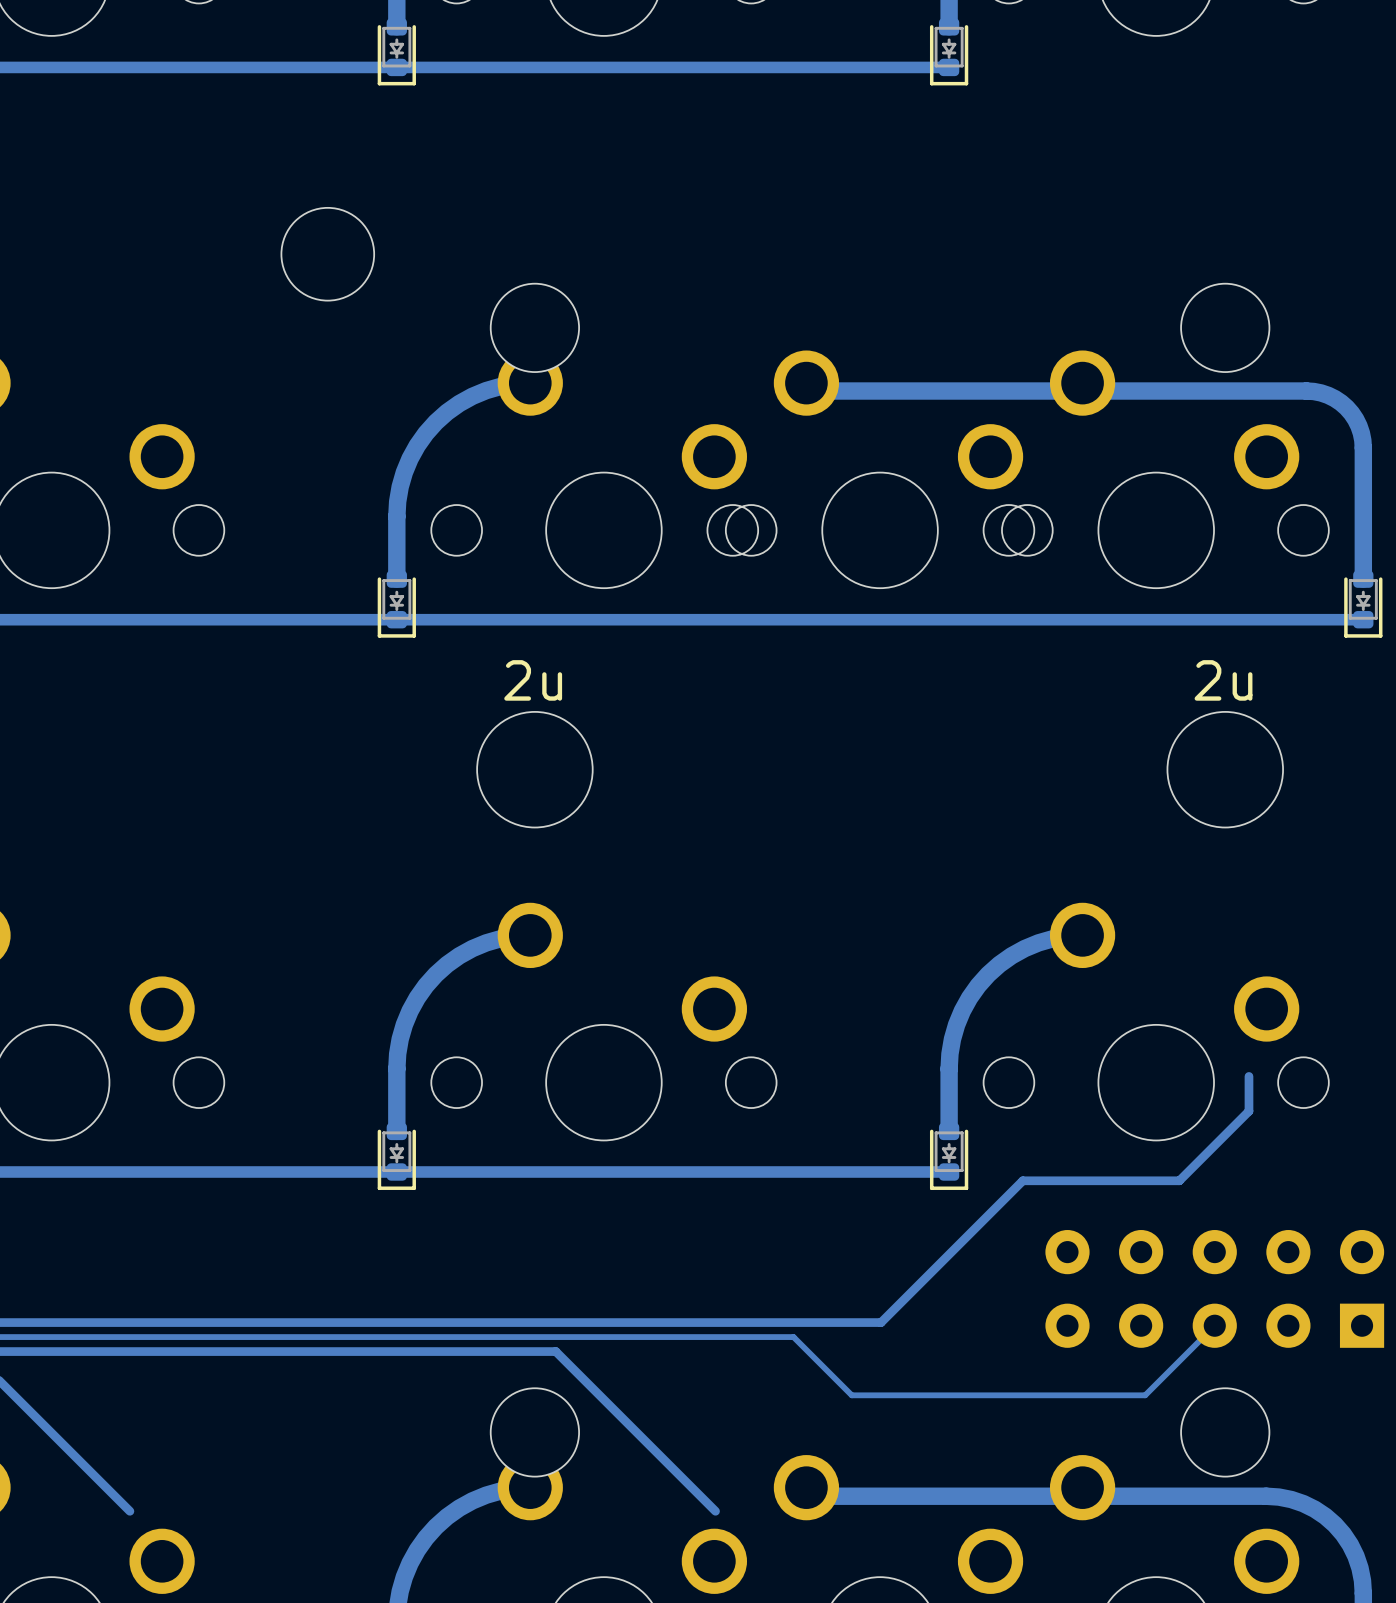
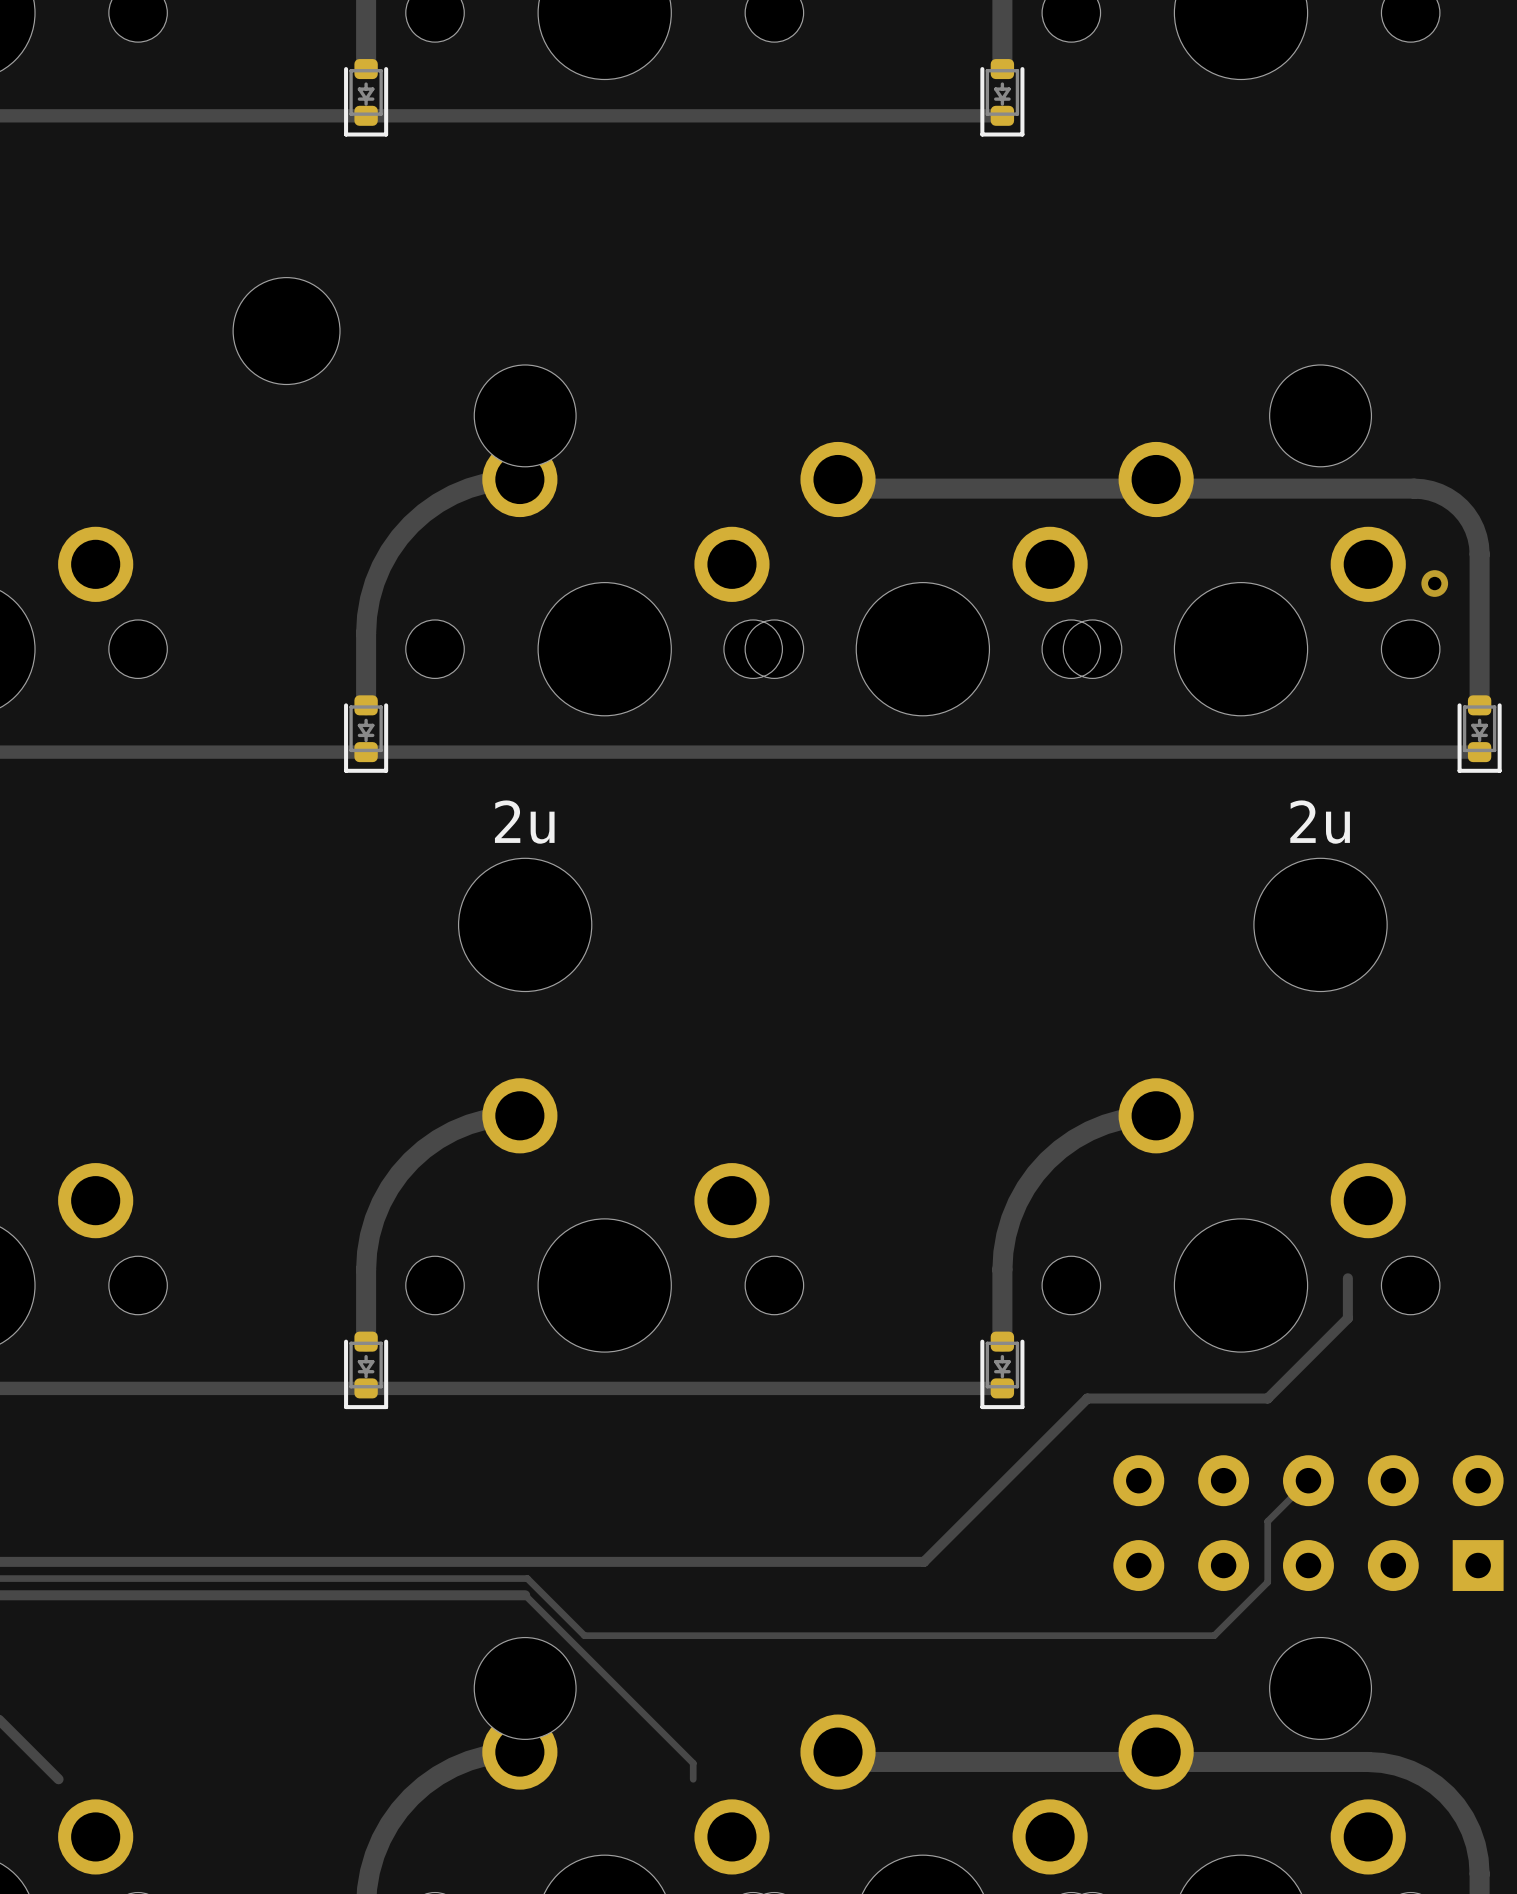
via: none -> (1434, 583)
track: (1214, 1325) (1145, 1395) (851, 1395) (793, 1337) (536, 1337) -> (1308, 1480) (1267, 1521) (1267, 1582) (1214, 1635) (584, 1635) (527, 1578)
track: (534, 1351) (555, 1351) (715, 1511) -> (525, 1595) (693, 1763) (693, 1779)

